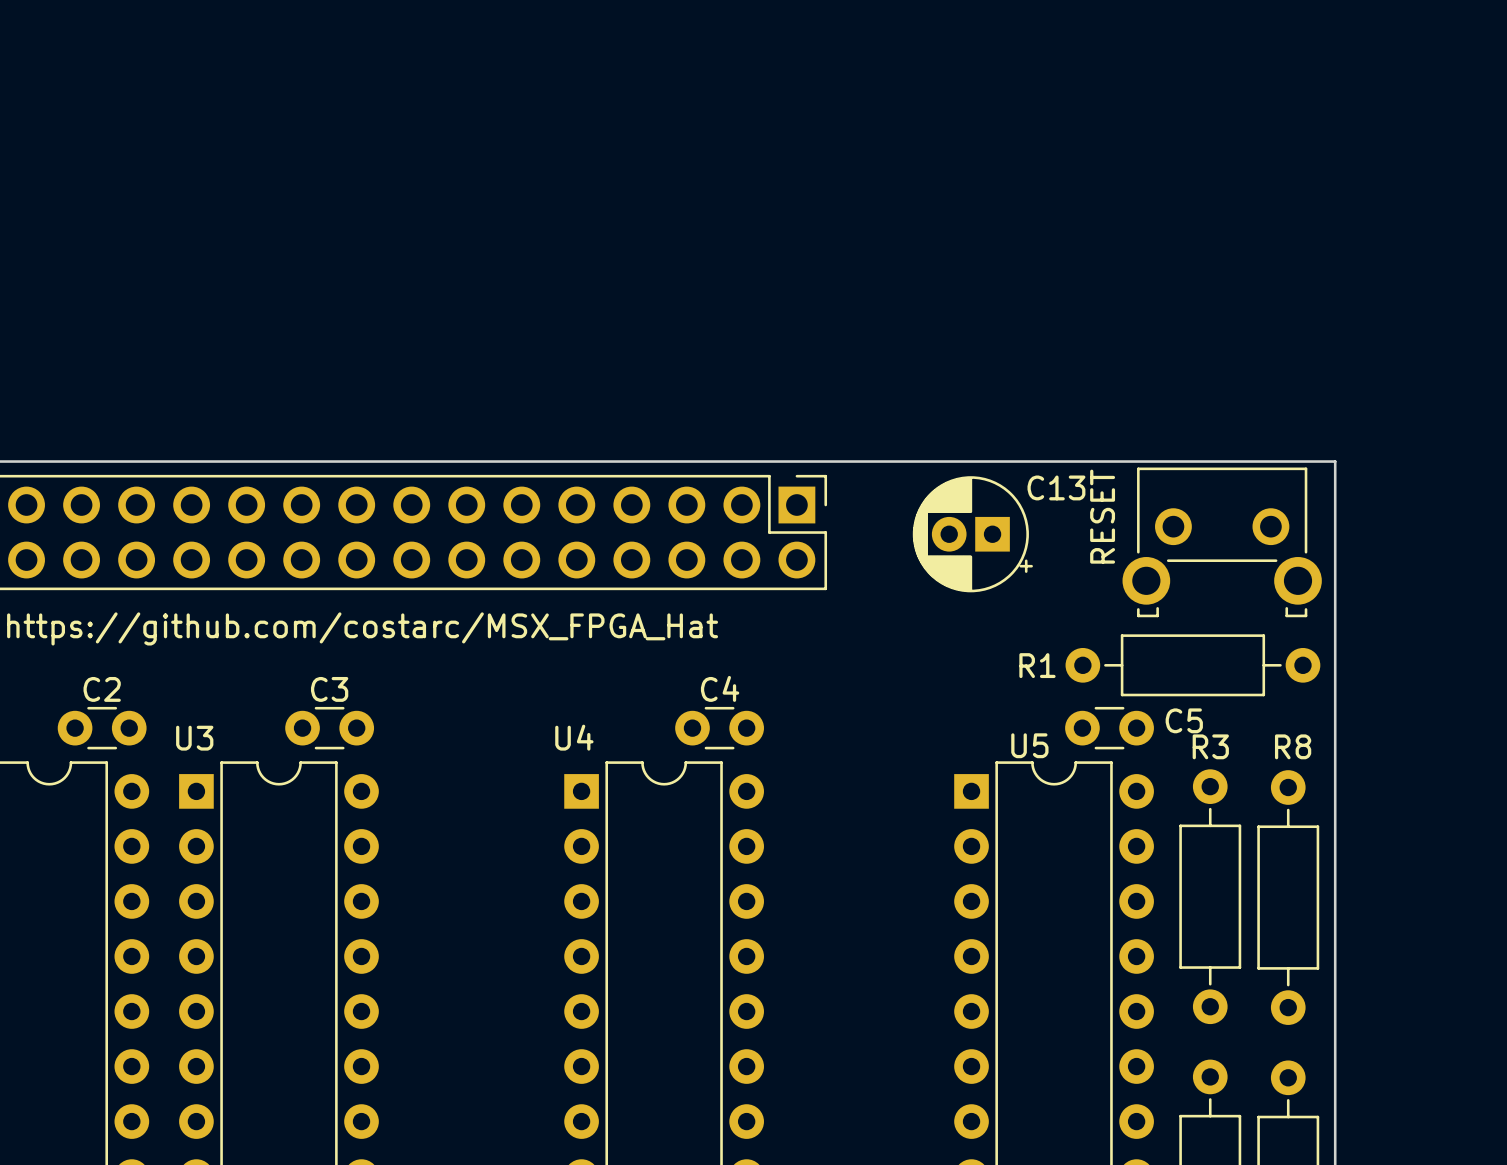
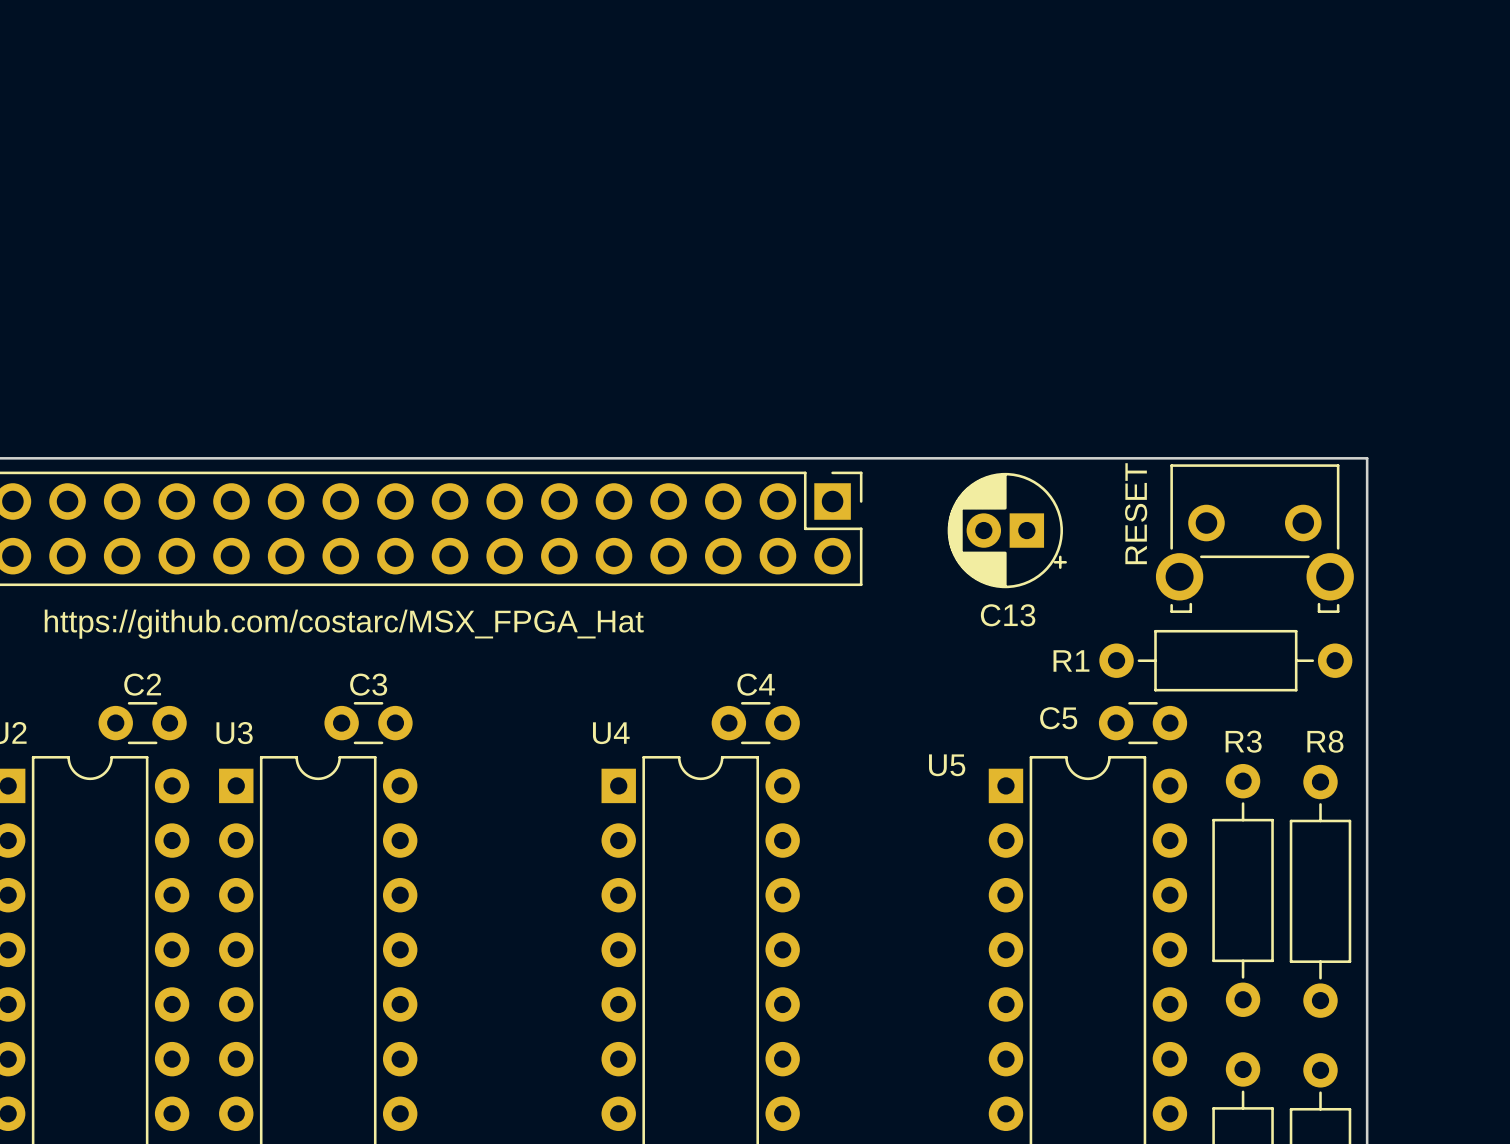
C13 name position: C13 (1056, 487) -> C13 (1008, 615)
C5 name position: C5 (1184, 720) -> C5 (1058, 718)
U5 name position: U5 (1029, 745) -> U5 (947, 765)

